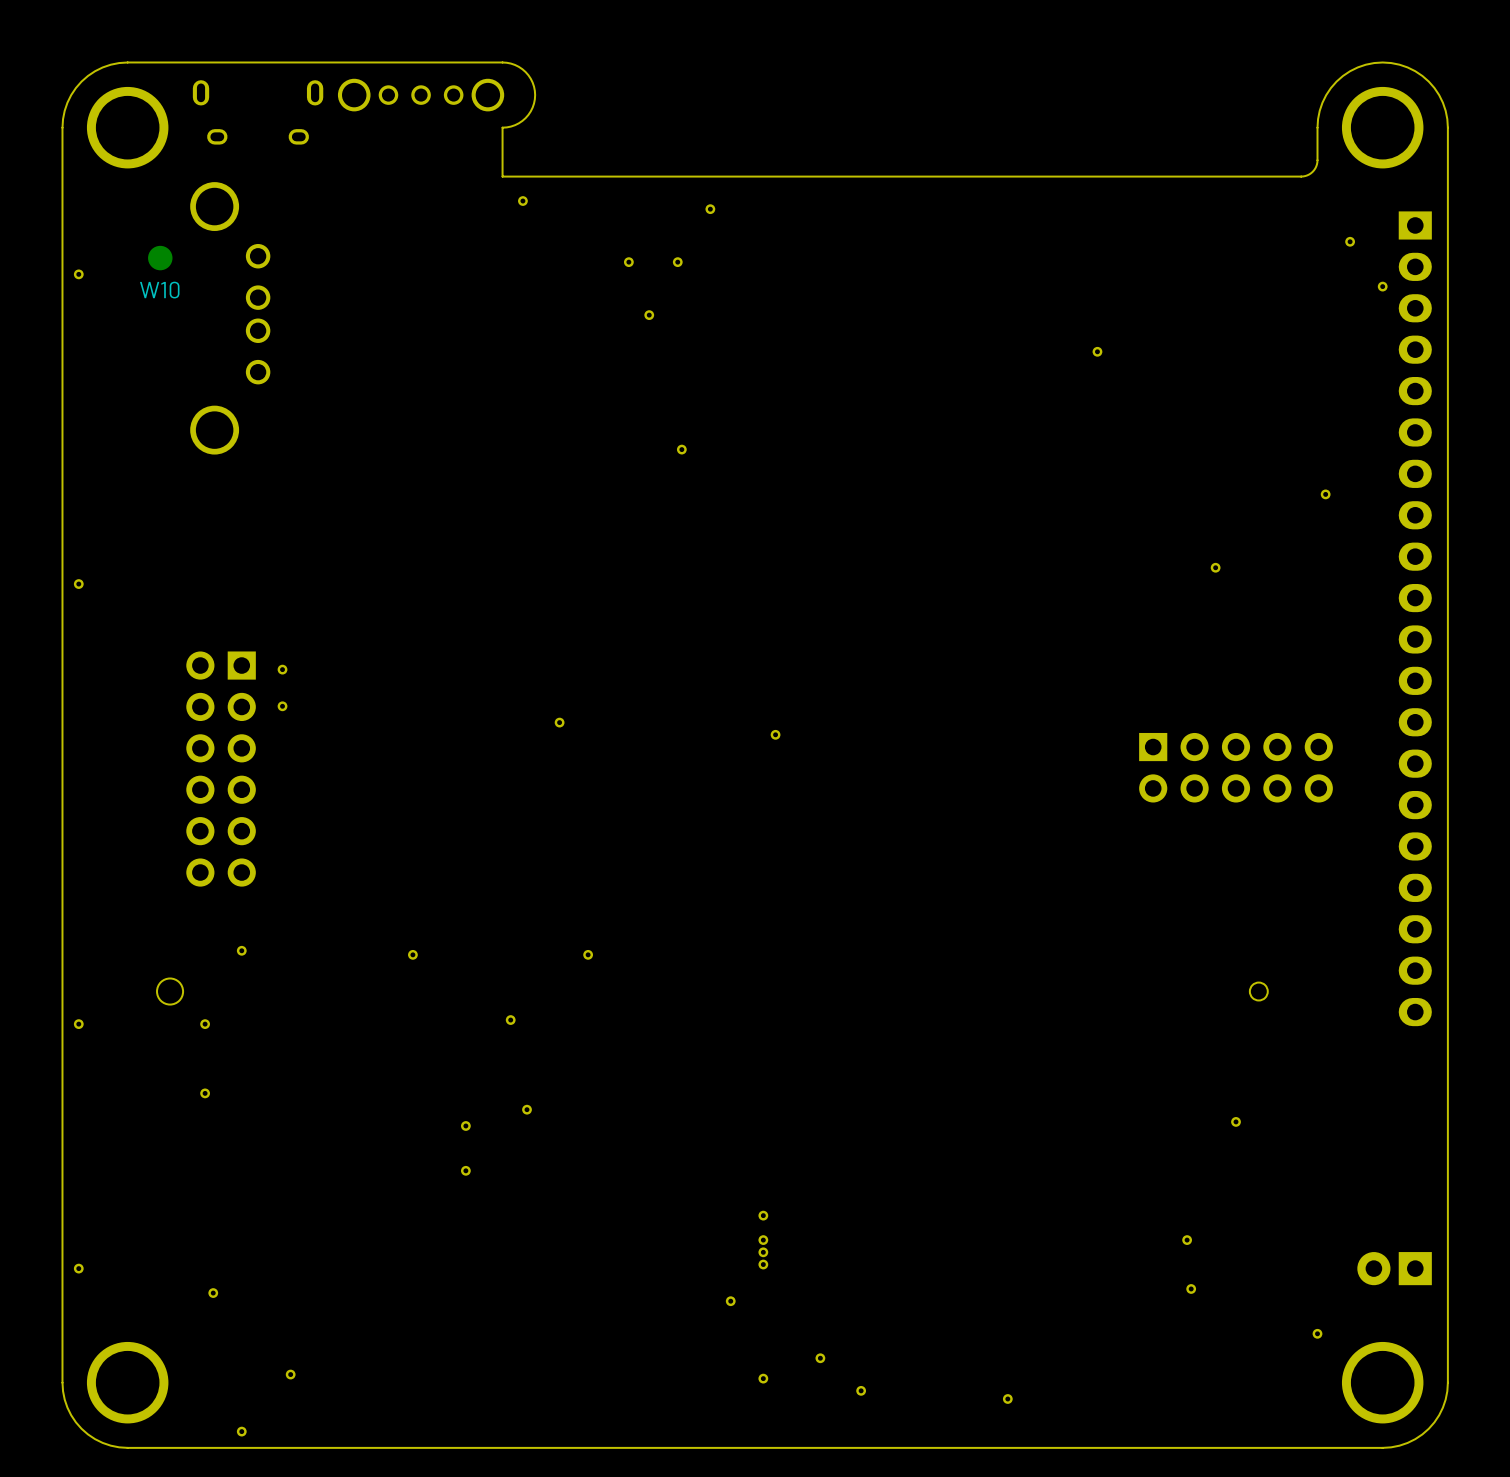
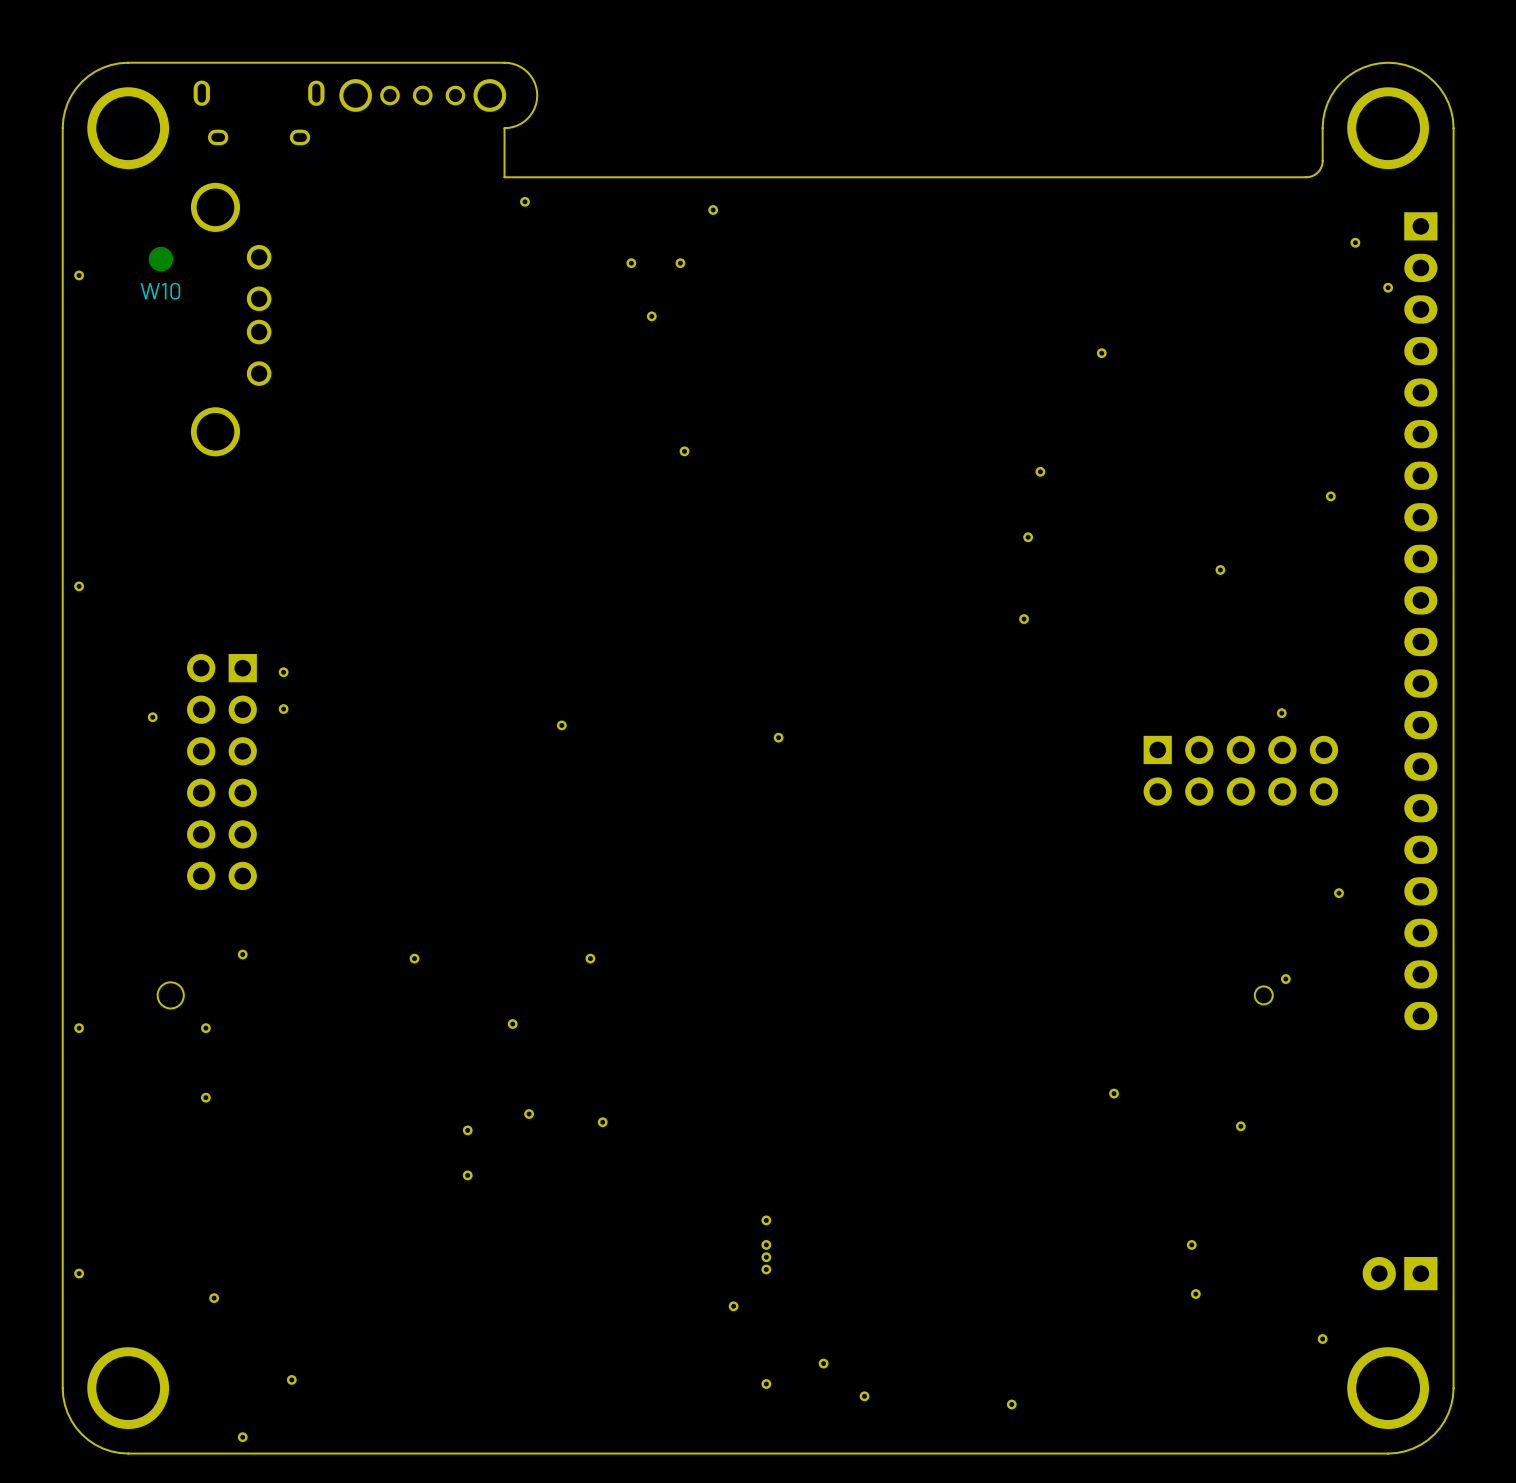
part: none -> (1040, 471)
part: none -> (1028, 537)
part: none -> (1024, 619)
part: none -> (1281, 713)
part: none -> (152, 717)
part: none -> (1339, 893)
part: none -> (1285, 979)
part: none -> (1114, 1093)
part: none -> (602, 1122)

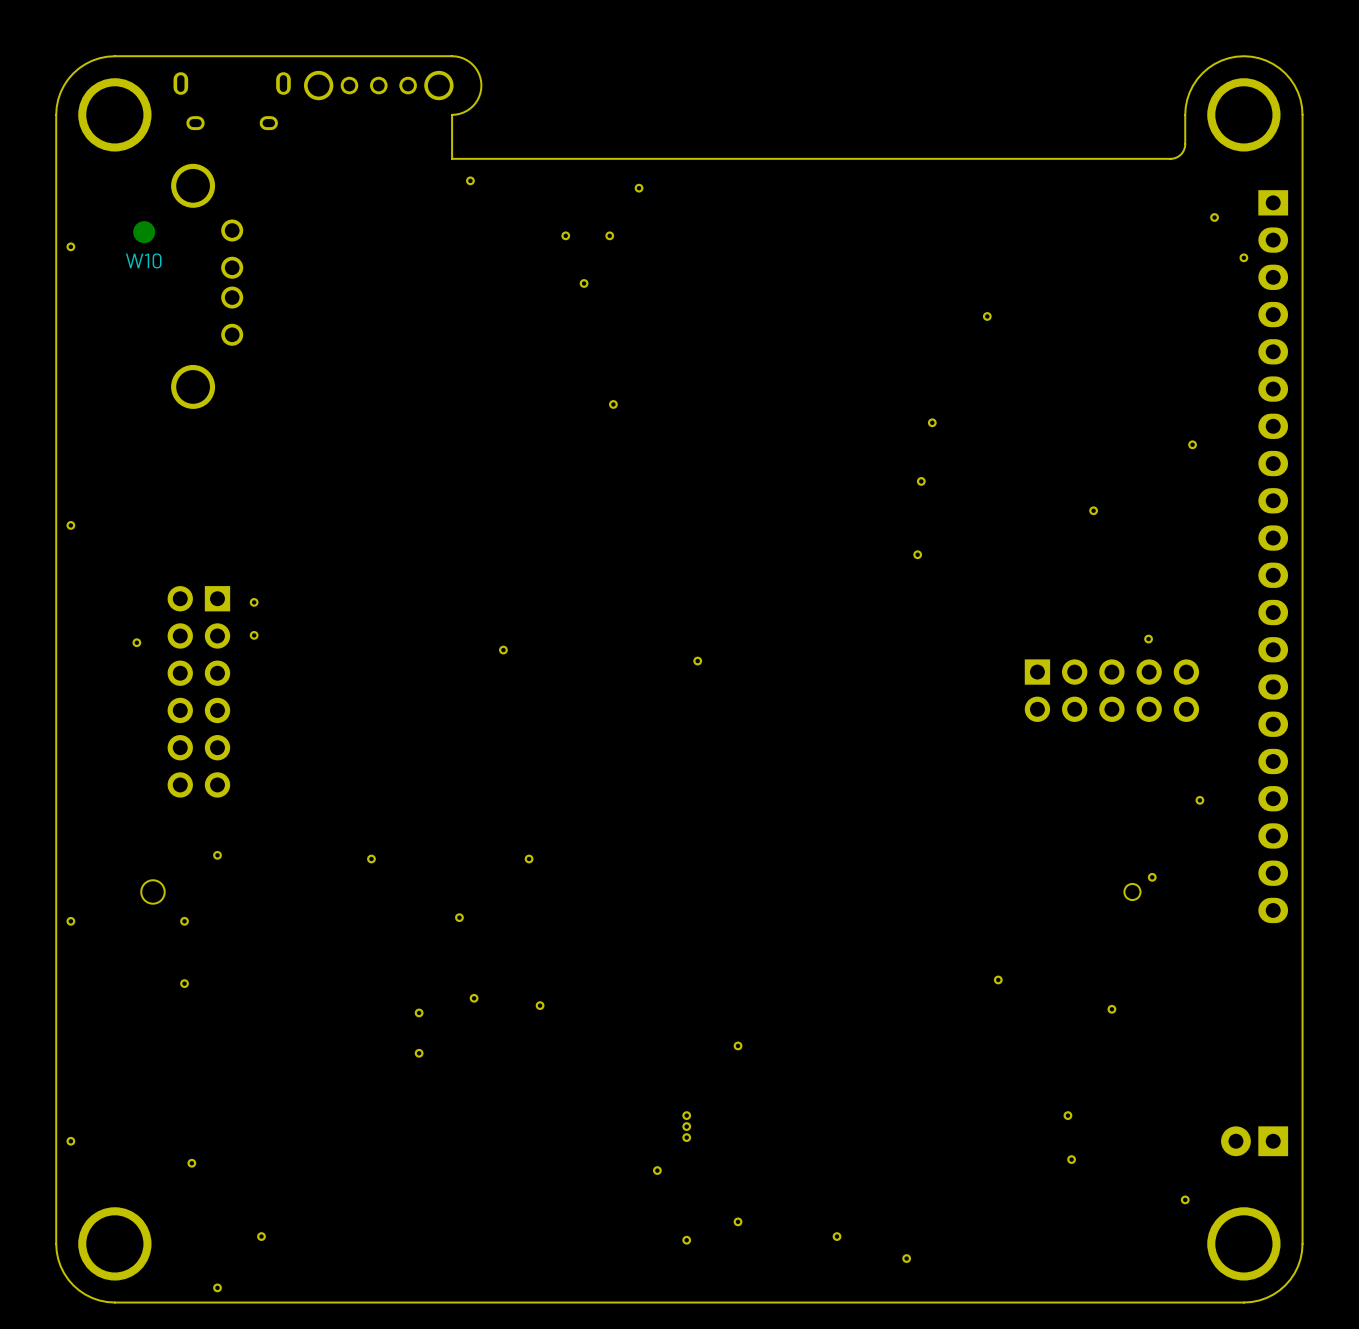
part position: (766, 1220) -> (738, 1045)
part position: (864, 1396) -> (837, 1236)

